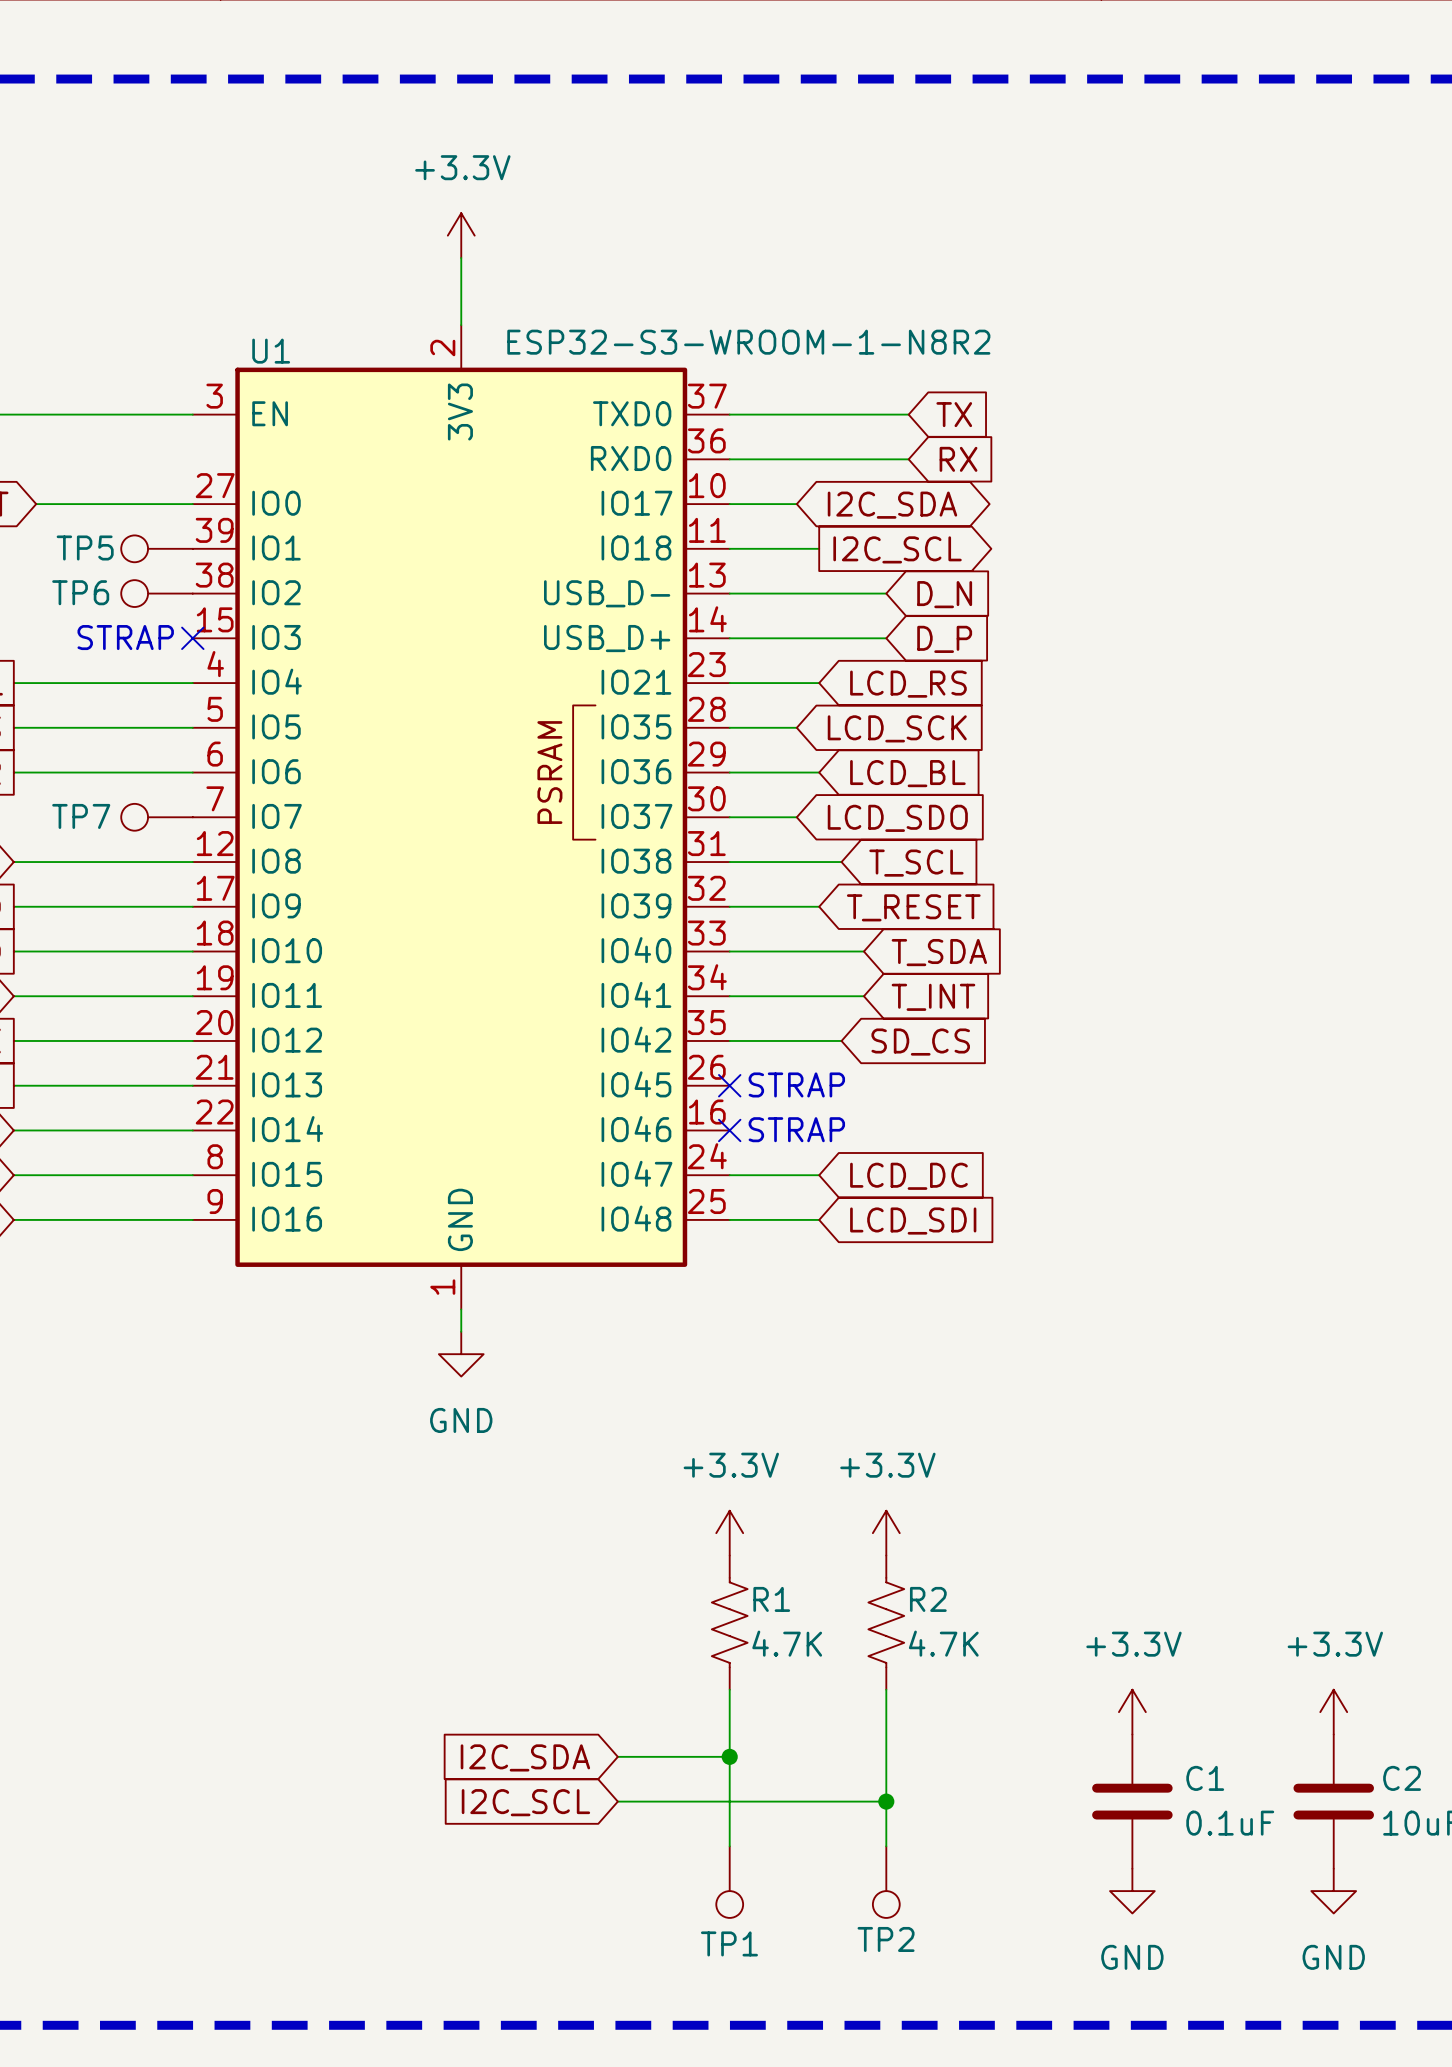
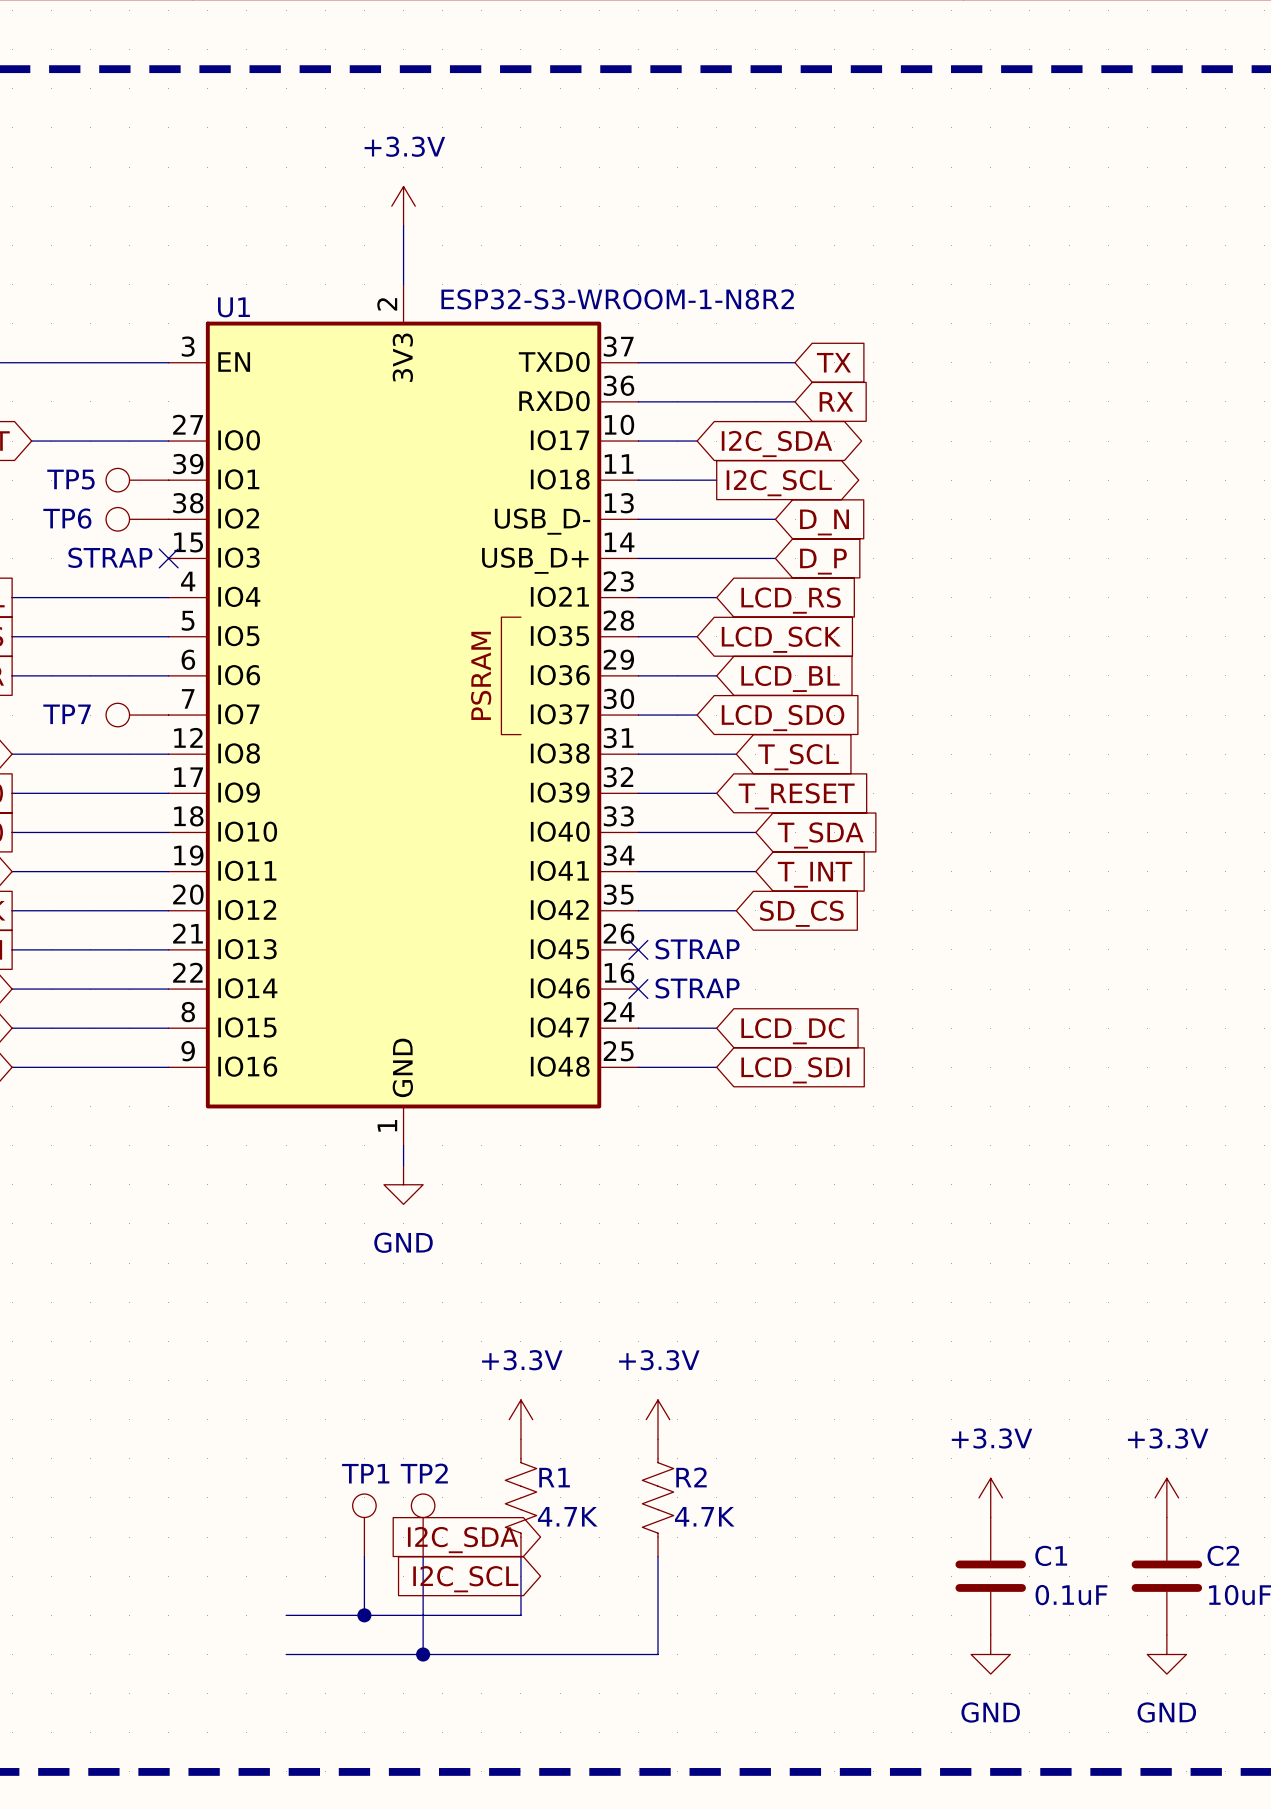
power symbol: +3.3V (729, 1533) -> none
power symbol: +3.3V (886, 1533) -> none
power symbol: none -> +3.3V (520, 1419)
R1 position: (729, 1622) -> (520, 1497)
power symbol: none -> +3.3V (657, 1419)
R2 position: (886, 1622) -> (657, 1497)
wire: (729, 1689) (729, 1846) -> none
wire: (886, 1689) (886, 1846) -> none
wire: (617, 1756) (729, 1756) -> none
junction: (729, 1756) -> none
wire: none -> (364, 1556) (364, 1615)
wire: none -> (423, 1556) (423, 1654)
wire: none -> (520, 1556) (520, 1615) (286, 1615)
wire: none -> (657, 1556) (657, 1654) (286, 1654)
wire: (617, 1801) (886, 1801) -> none
junction: (886, 1801) -> none
junction: none -> (364, 1615)
TP1 position: (729, 1882) -> (364, 1525)
TP2 position: (886, 1882) -> (423, 1525)
junction: none -> (423, 1654)
TP1 rotation: 0° (729, 1904) -> 180° (364, 1505)
TP2 rotation: 0° (886, 1904) -> 180° (423, 1505)

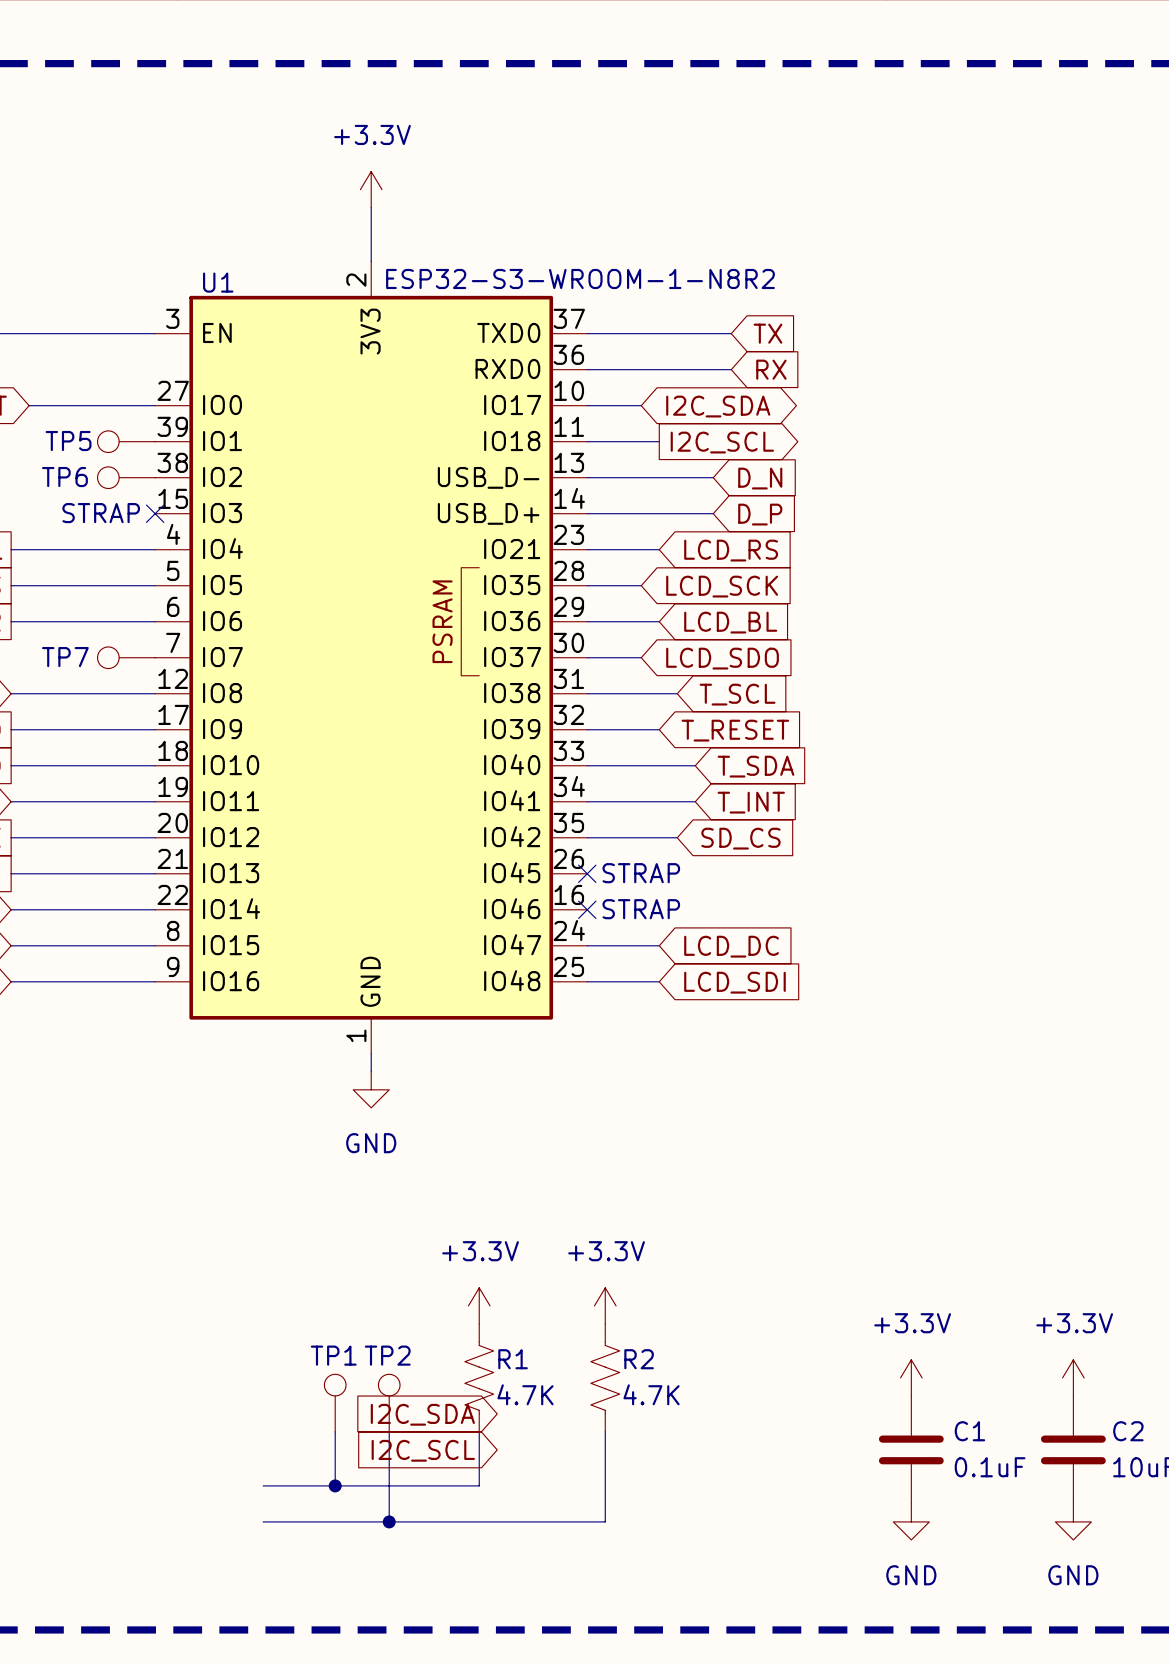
U1 value position: ESP32-S3-WROOM-1-N8R2 (617, 299) -> ESP32-S3-WROOM-1-N8R2 (580, 278)

